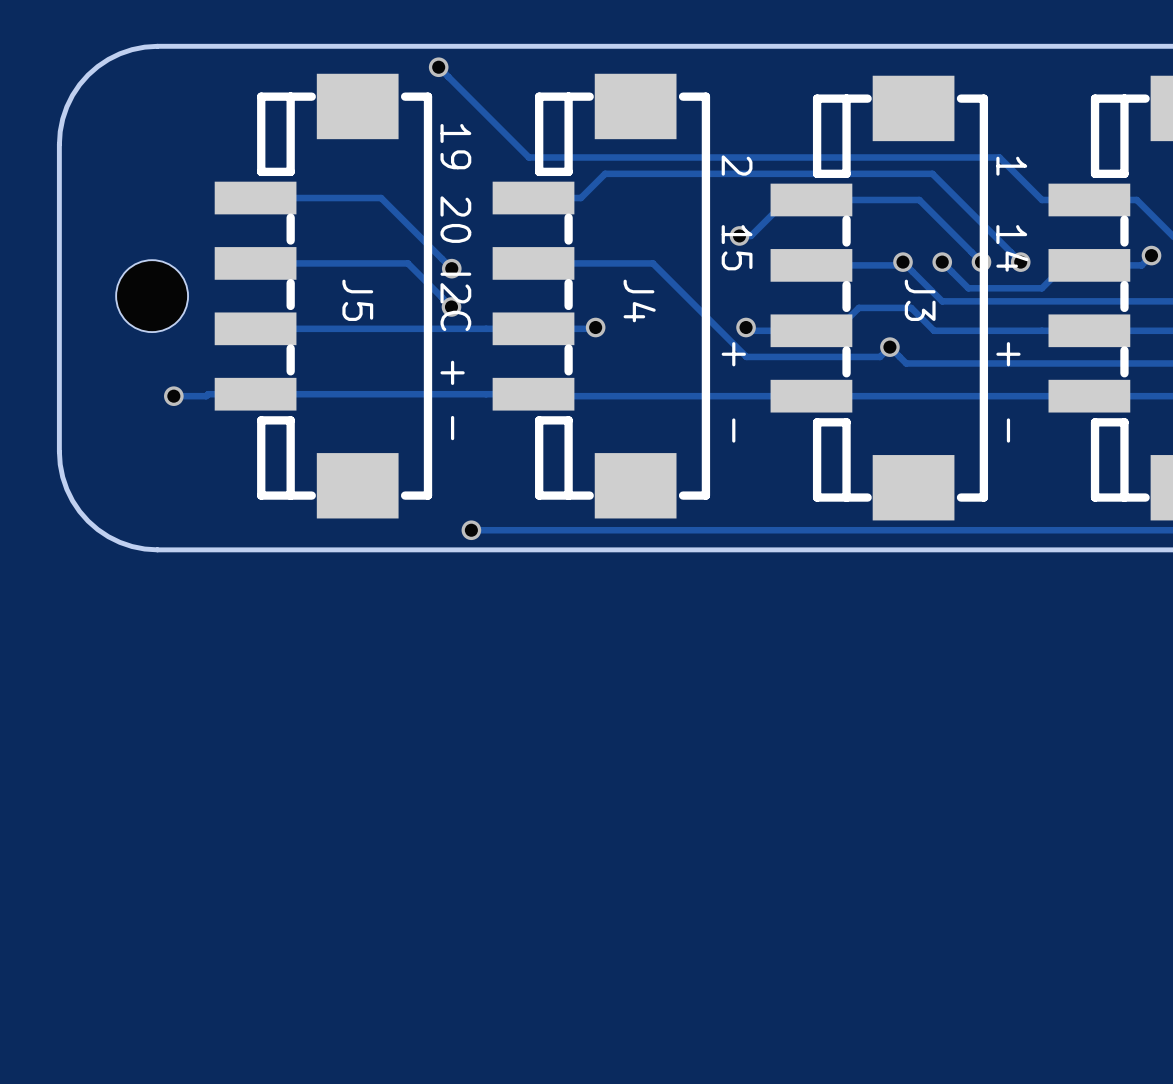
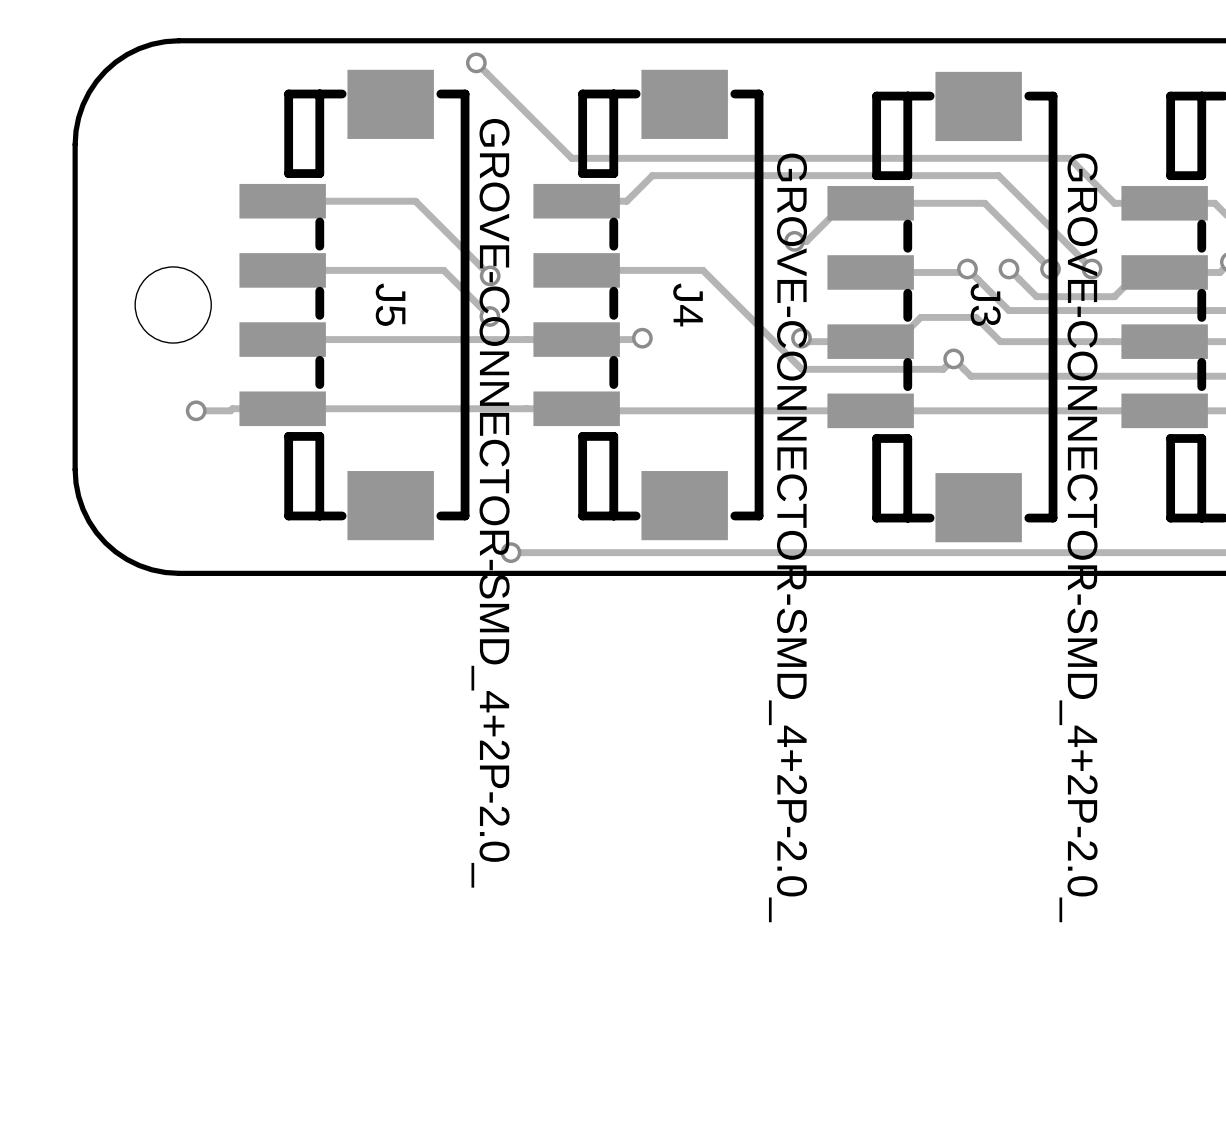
J5 value: 19 20 I2C + - (455, 282) -> GROVE-CONNECTOR-SMD_4+2P-2.0_ (490, 503)
J4 value: 2 15 + - (737, 299) -> GROVE-CONNECTOR-SMD_4+2P-2.0_ (787, 537)
J3 value: 1 14 + - (1012, 299) -> GROVE-CONNECTOR-SMD_4+2P-2.0_ (1078, 537)

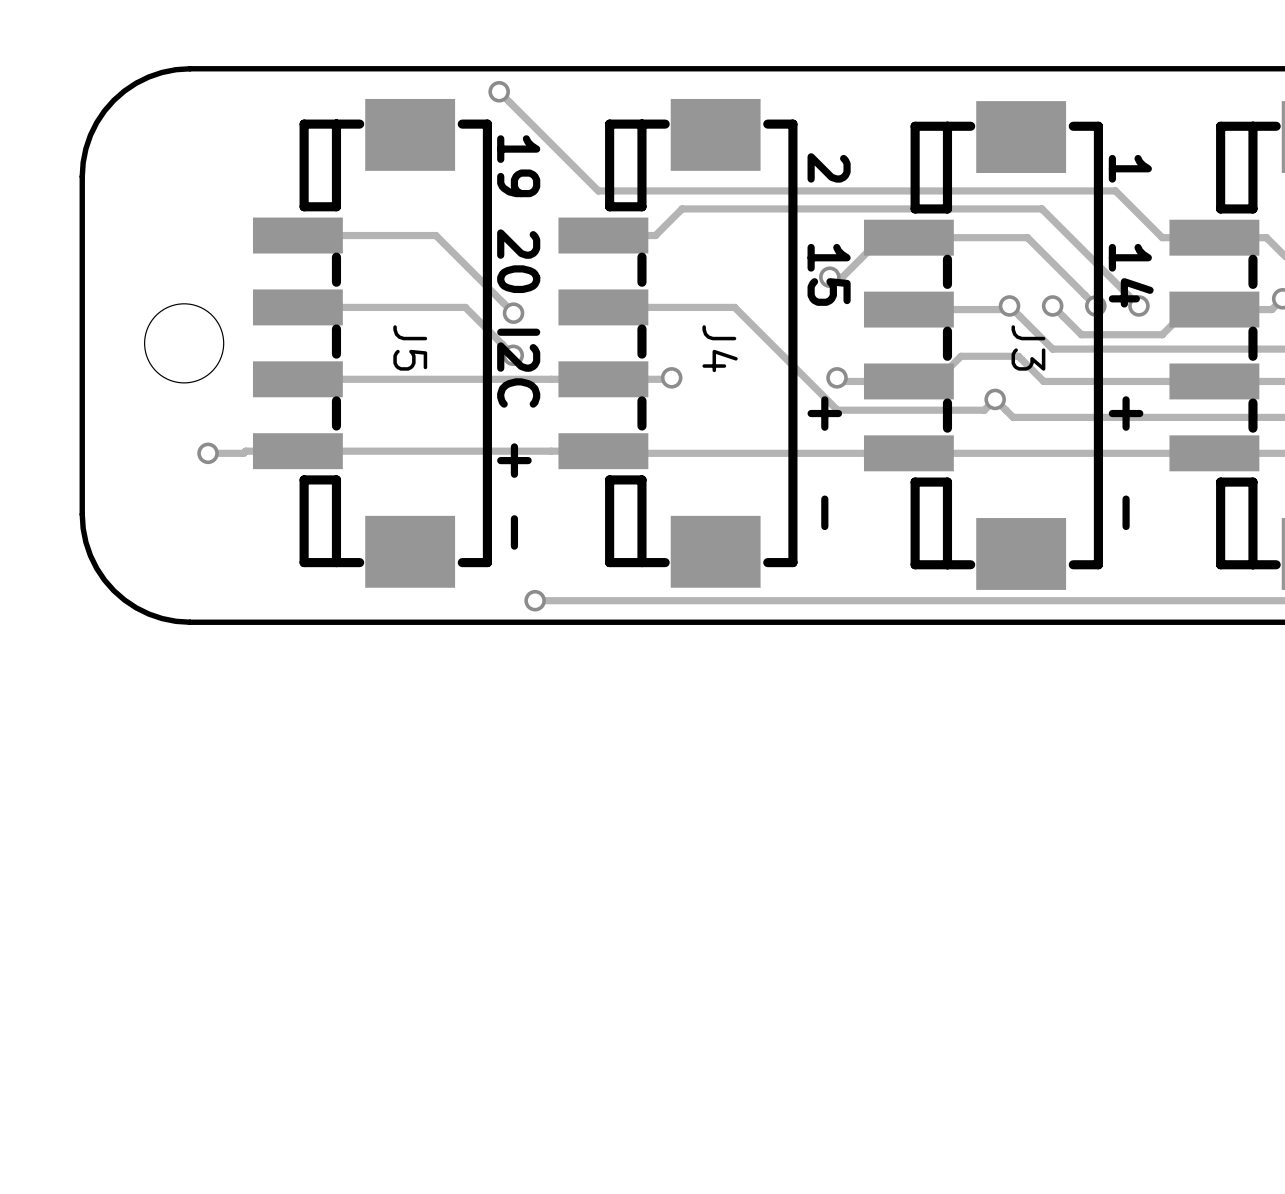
text: none -> 19 20 I2C + - (518, 342)
text: none -> 2 15 + - (829, 341)
text: none -> 1 14 + - (1131, 342)
J5 value: GROVE-CONNECTOR-SMD_4+2P-2.0_ (490, 503) -> none
J4 value: GROVE-CONNECTOR-SMD_4+2P-2.0_ (787, 537) -> none
J3 value: GROVE-CONNECTOR-SMD_4+2P-2.0_ (1078, 537) -> none

